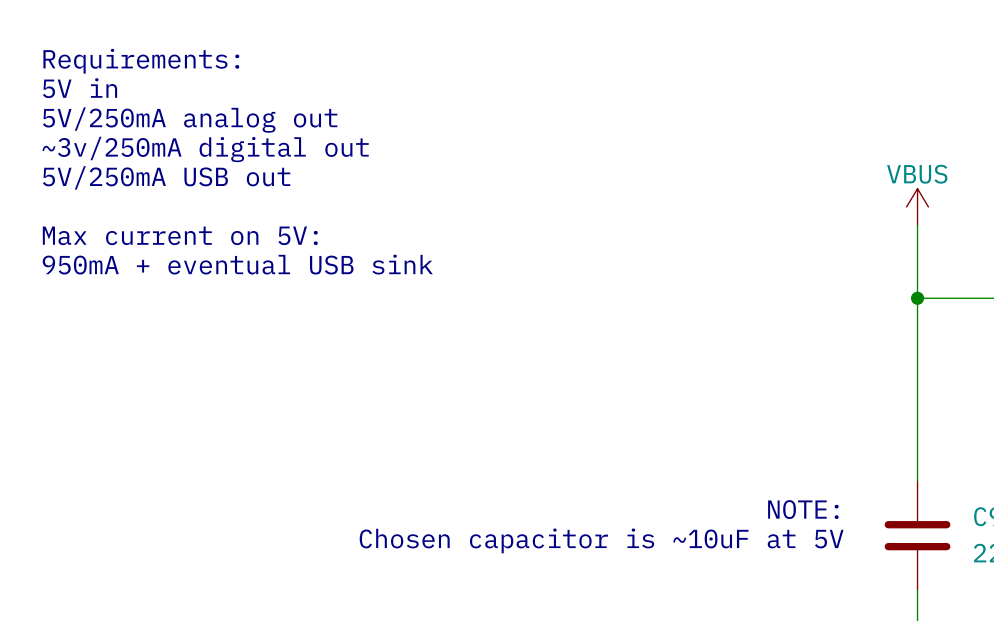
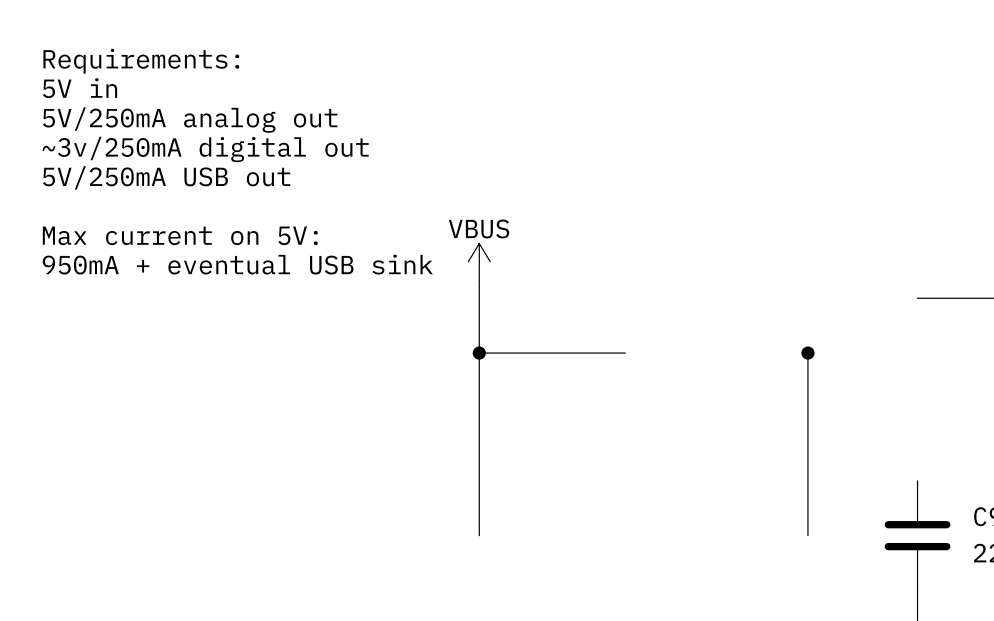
power symbol: VBUS (917, 206) -> none
wire: (917, 225) (917, 480) -> none
power symbol: none -> VBUS (479, 261)
wire: none -> (479, 280) (479, 535)
junction: (917, 298) -> none
wire: none -> (479, 353) (625, 353)
junction: none -> (479, 353)
wire: none -> (807, 353) (807, 535)
junction: none -> (807, 353)
text: NOTE: (803, 509) -> none
text: Chosen capacitor is ~10uF at 5V (601, 540) -> none

